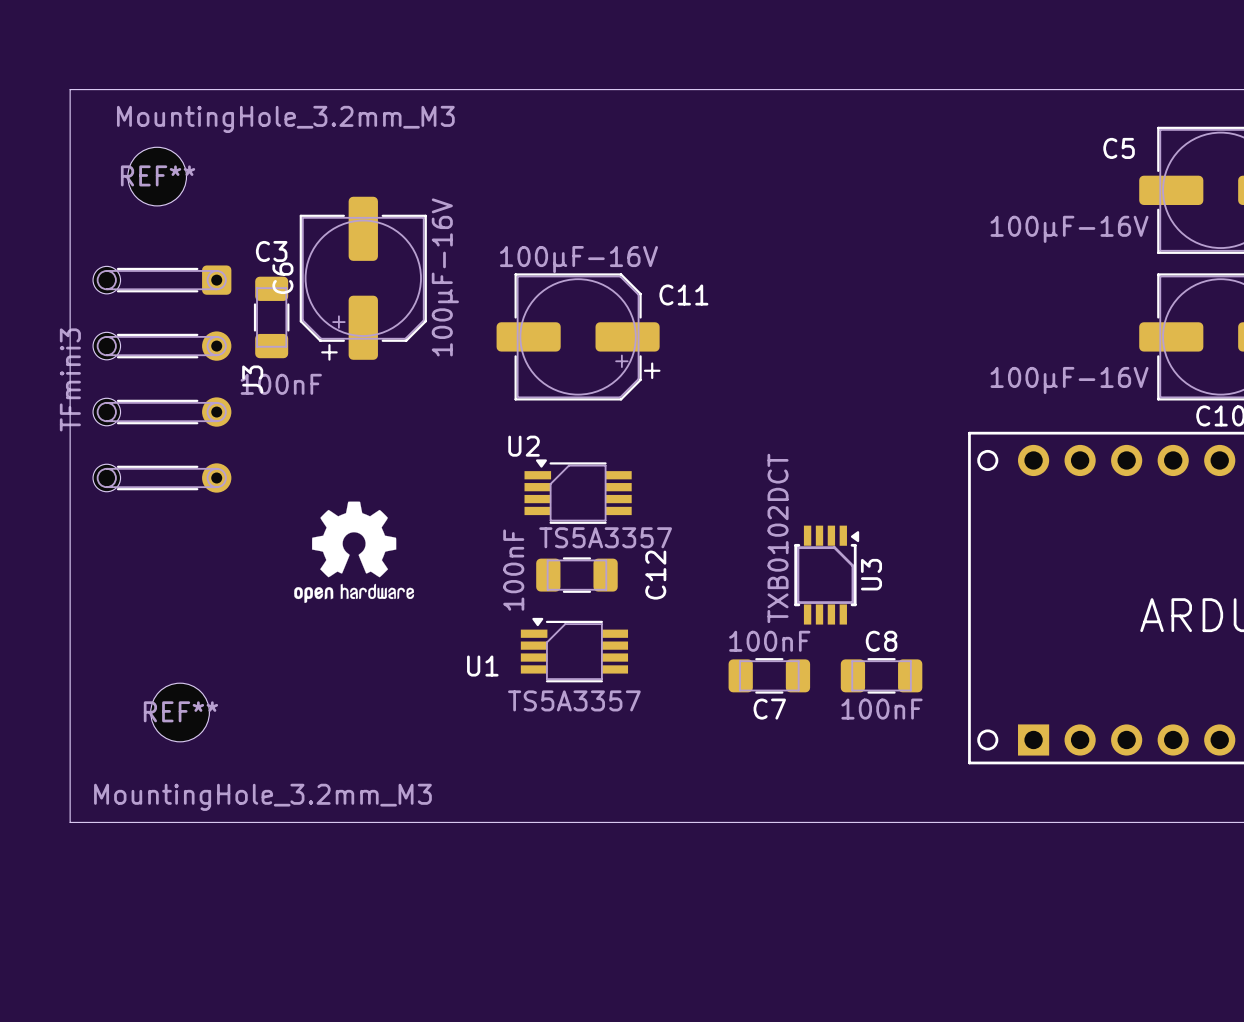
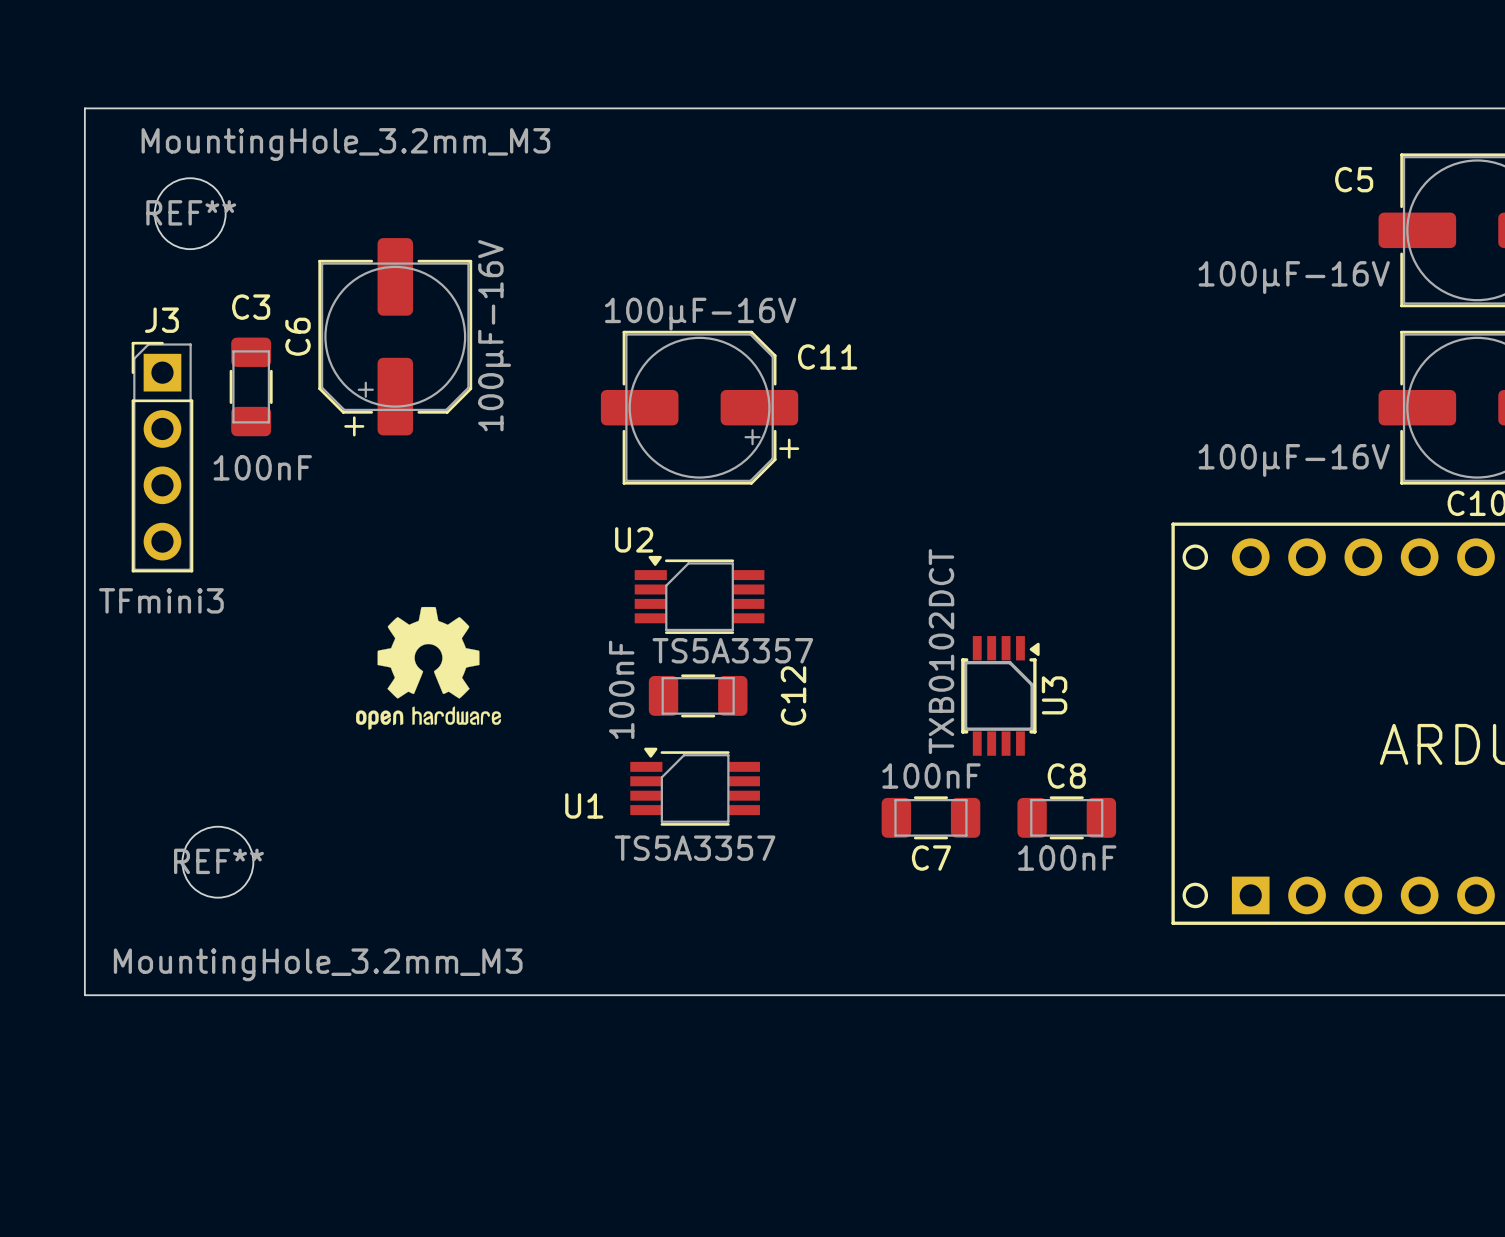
J3 footprint: [93, 265, 232, 493] -> [131, 341, 194, 573]
C6 position: (363, 278) -> (395, 337)
C3 position: (271, 317) -> (251, 386)
J3 value position: TFmini3 (70, 379) -> TFmini3 (161, 600)
J3 name position: J3 (252, 379) -> J3 (161, 320)

